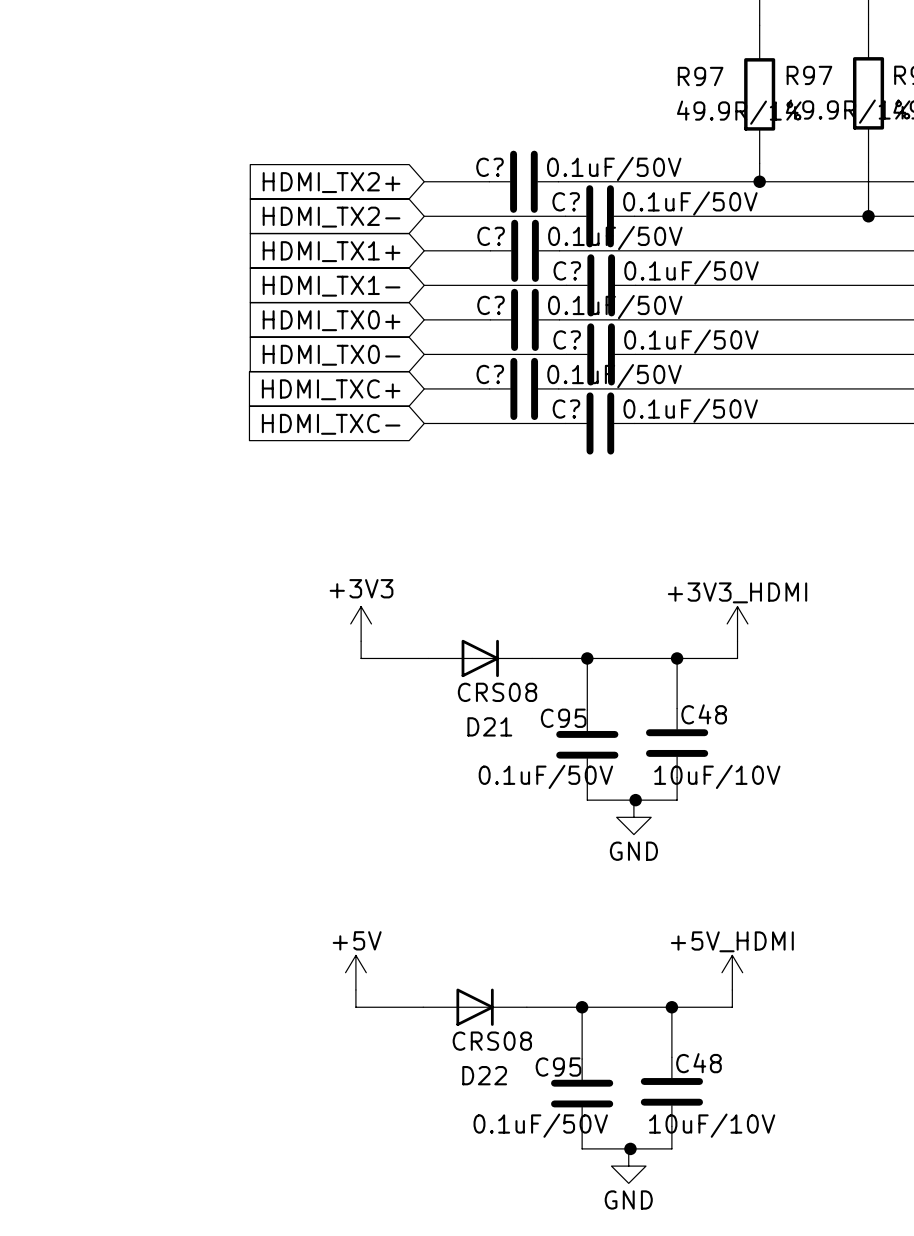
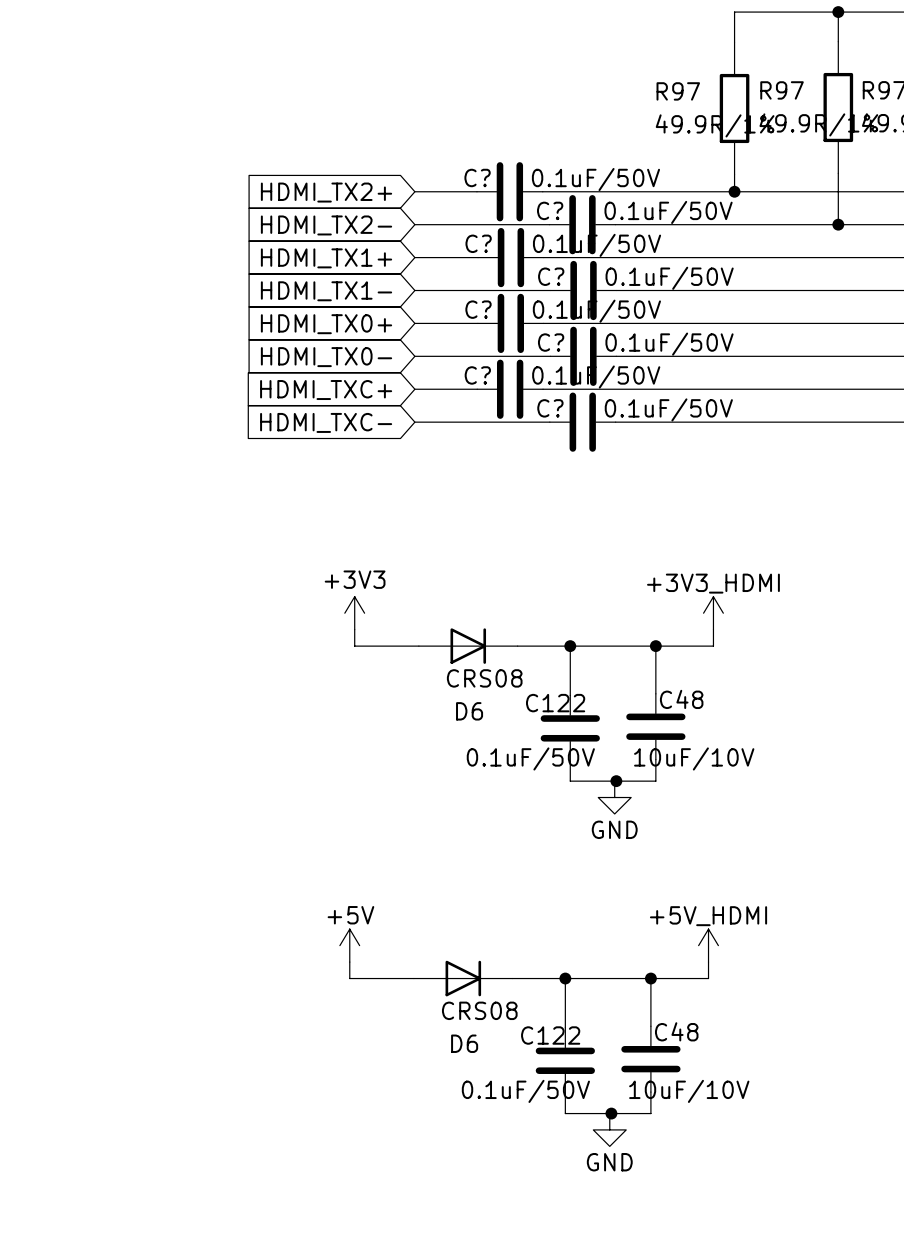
C95 name: C95 (563, 718) -> C122 (555, 703)
D21 name: D21 (489, 726) -> D6 (469, 711)
C95 name: C95 (558, 1067) -> C122 (550, 1035)
D22 name: D22 (484, 1075) -> D6 (464, 1043)

